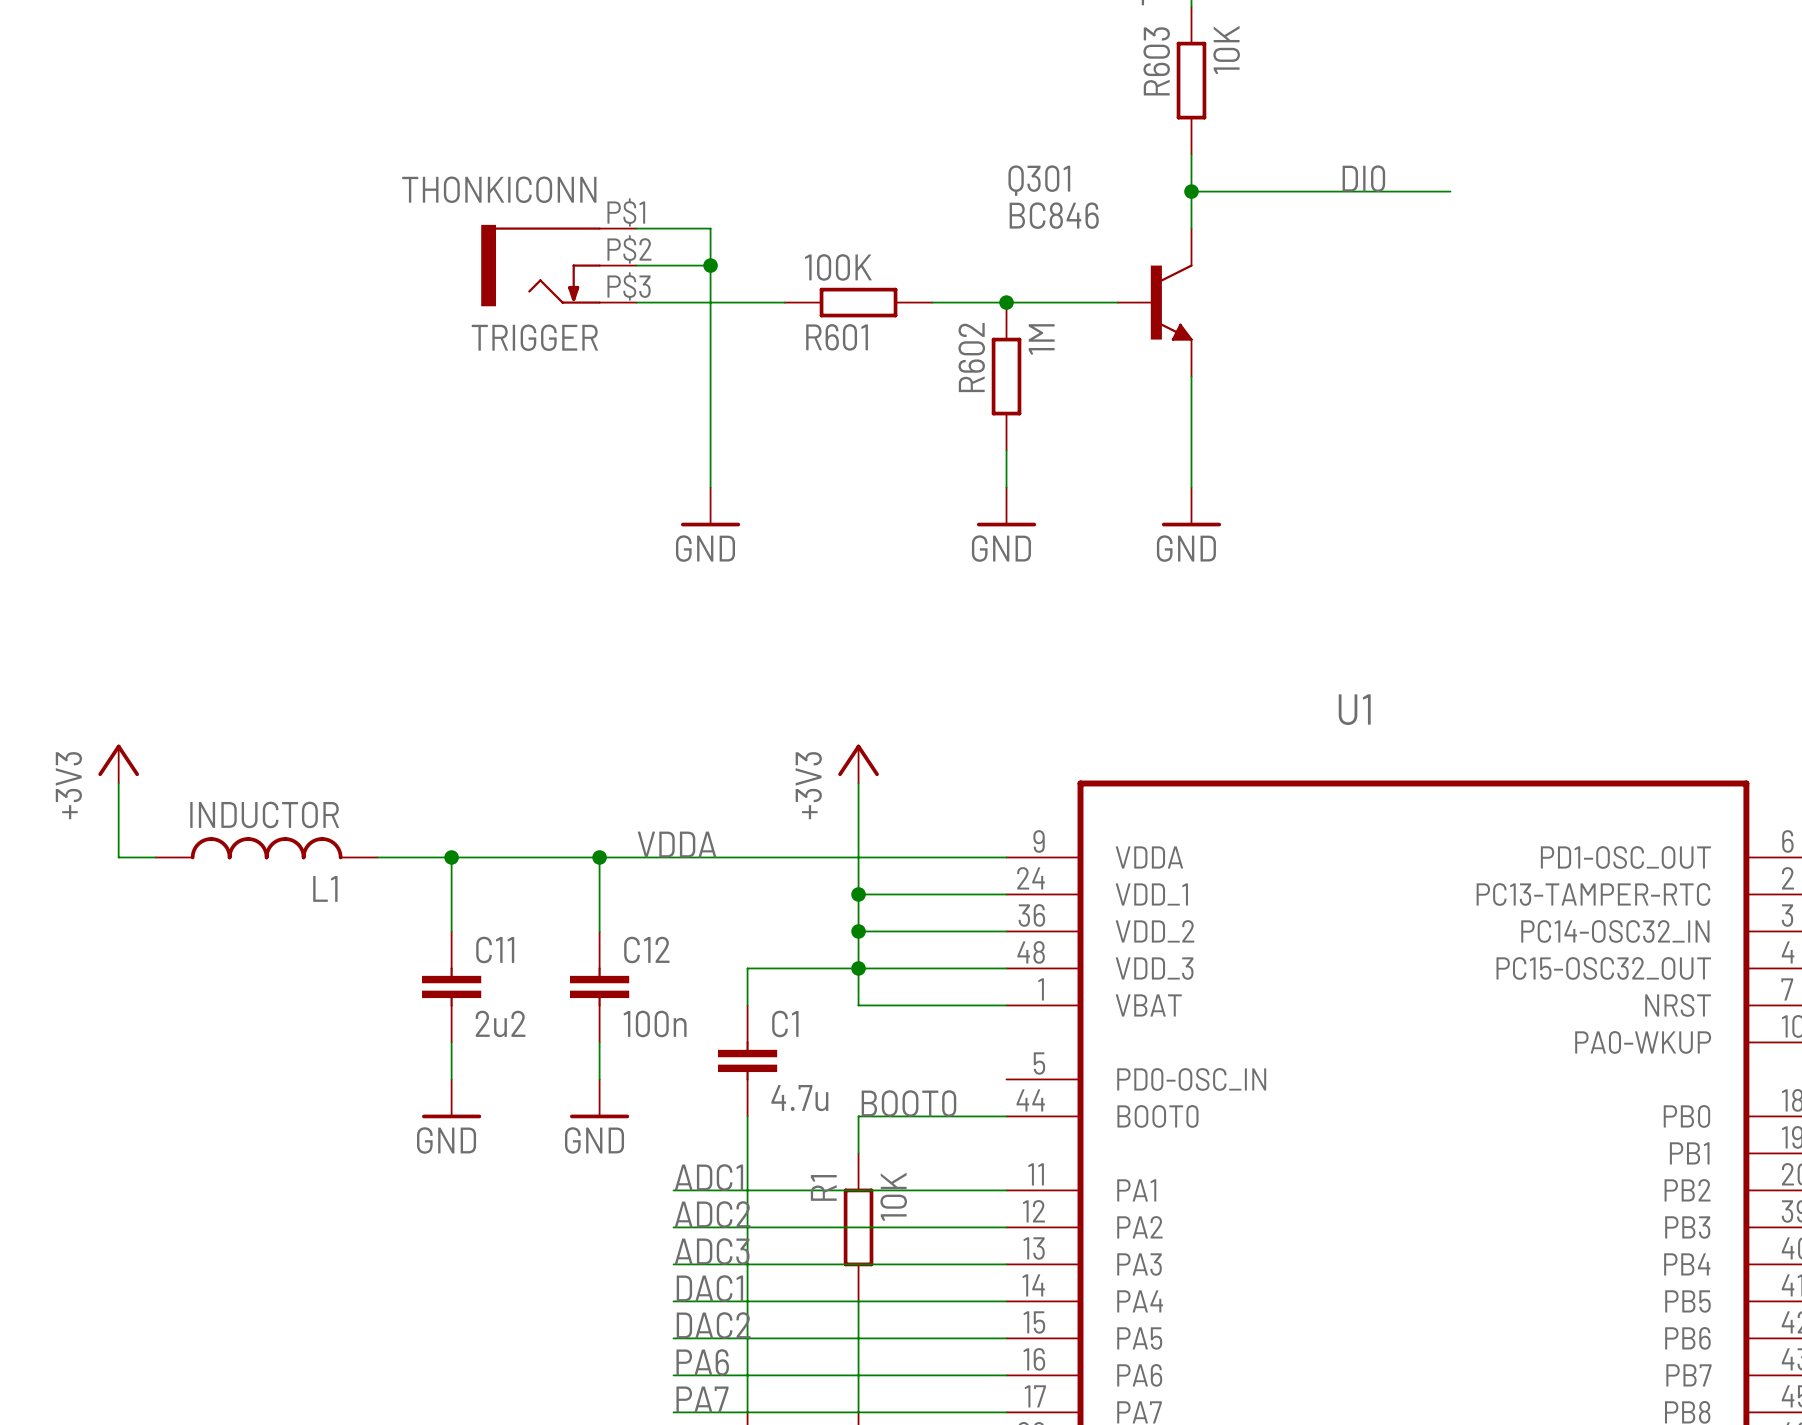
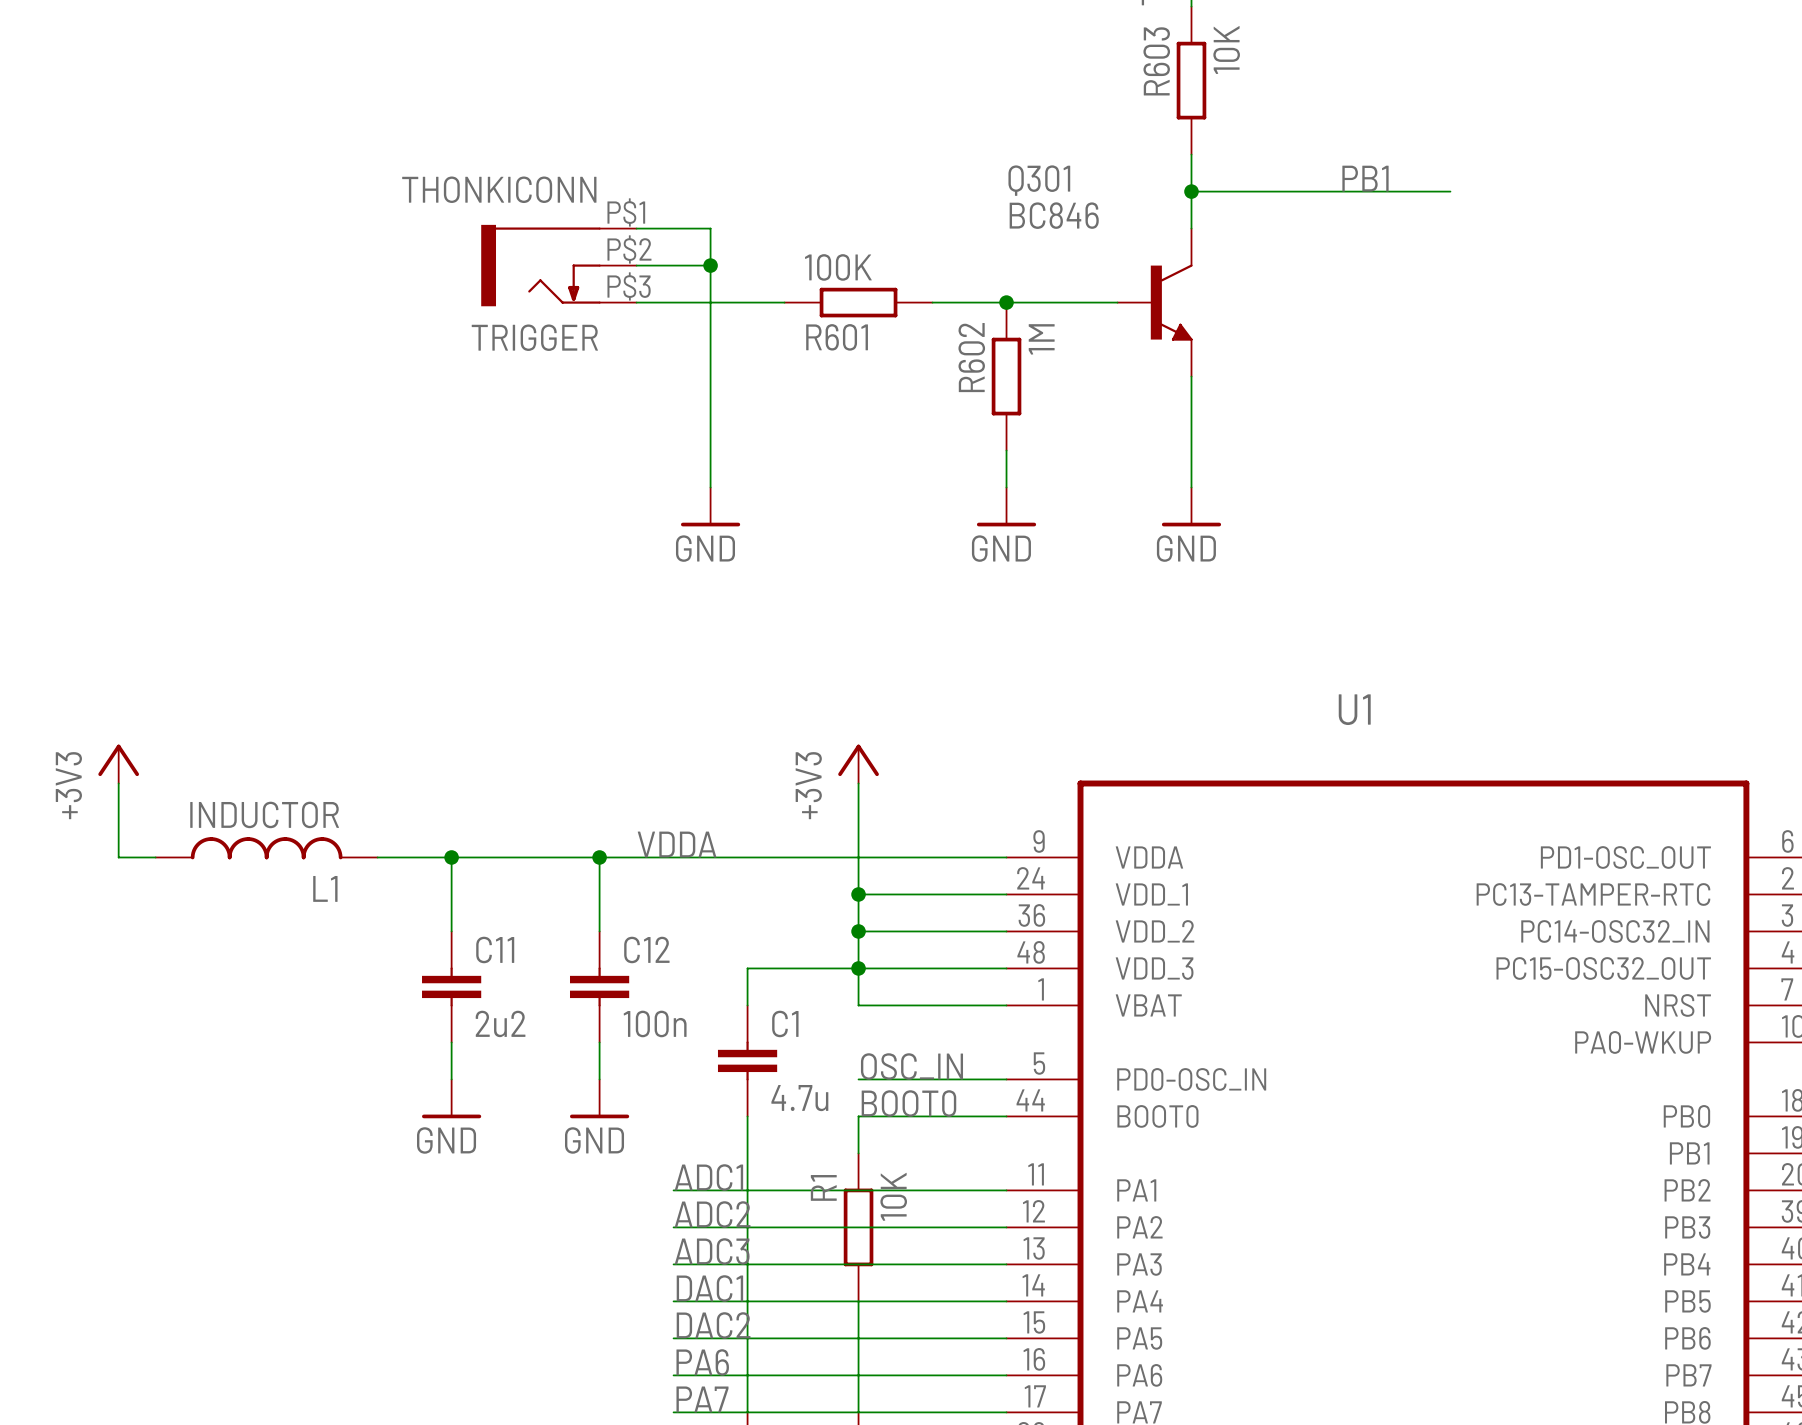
label: DI0 (1363, 178) -> PB1 (1365, 178)
label: none -> OSC_IN (911, 1066)
wire: none -> (858, 1079) (1006, 1079)

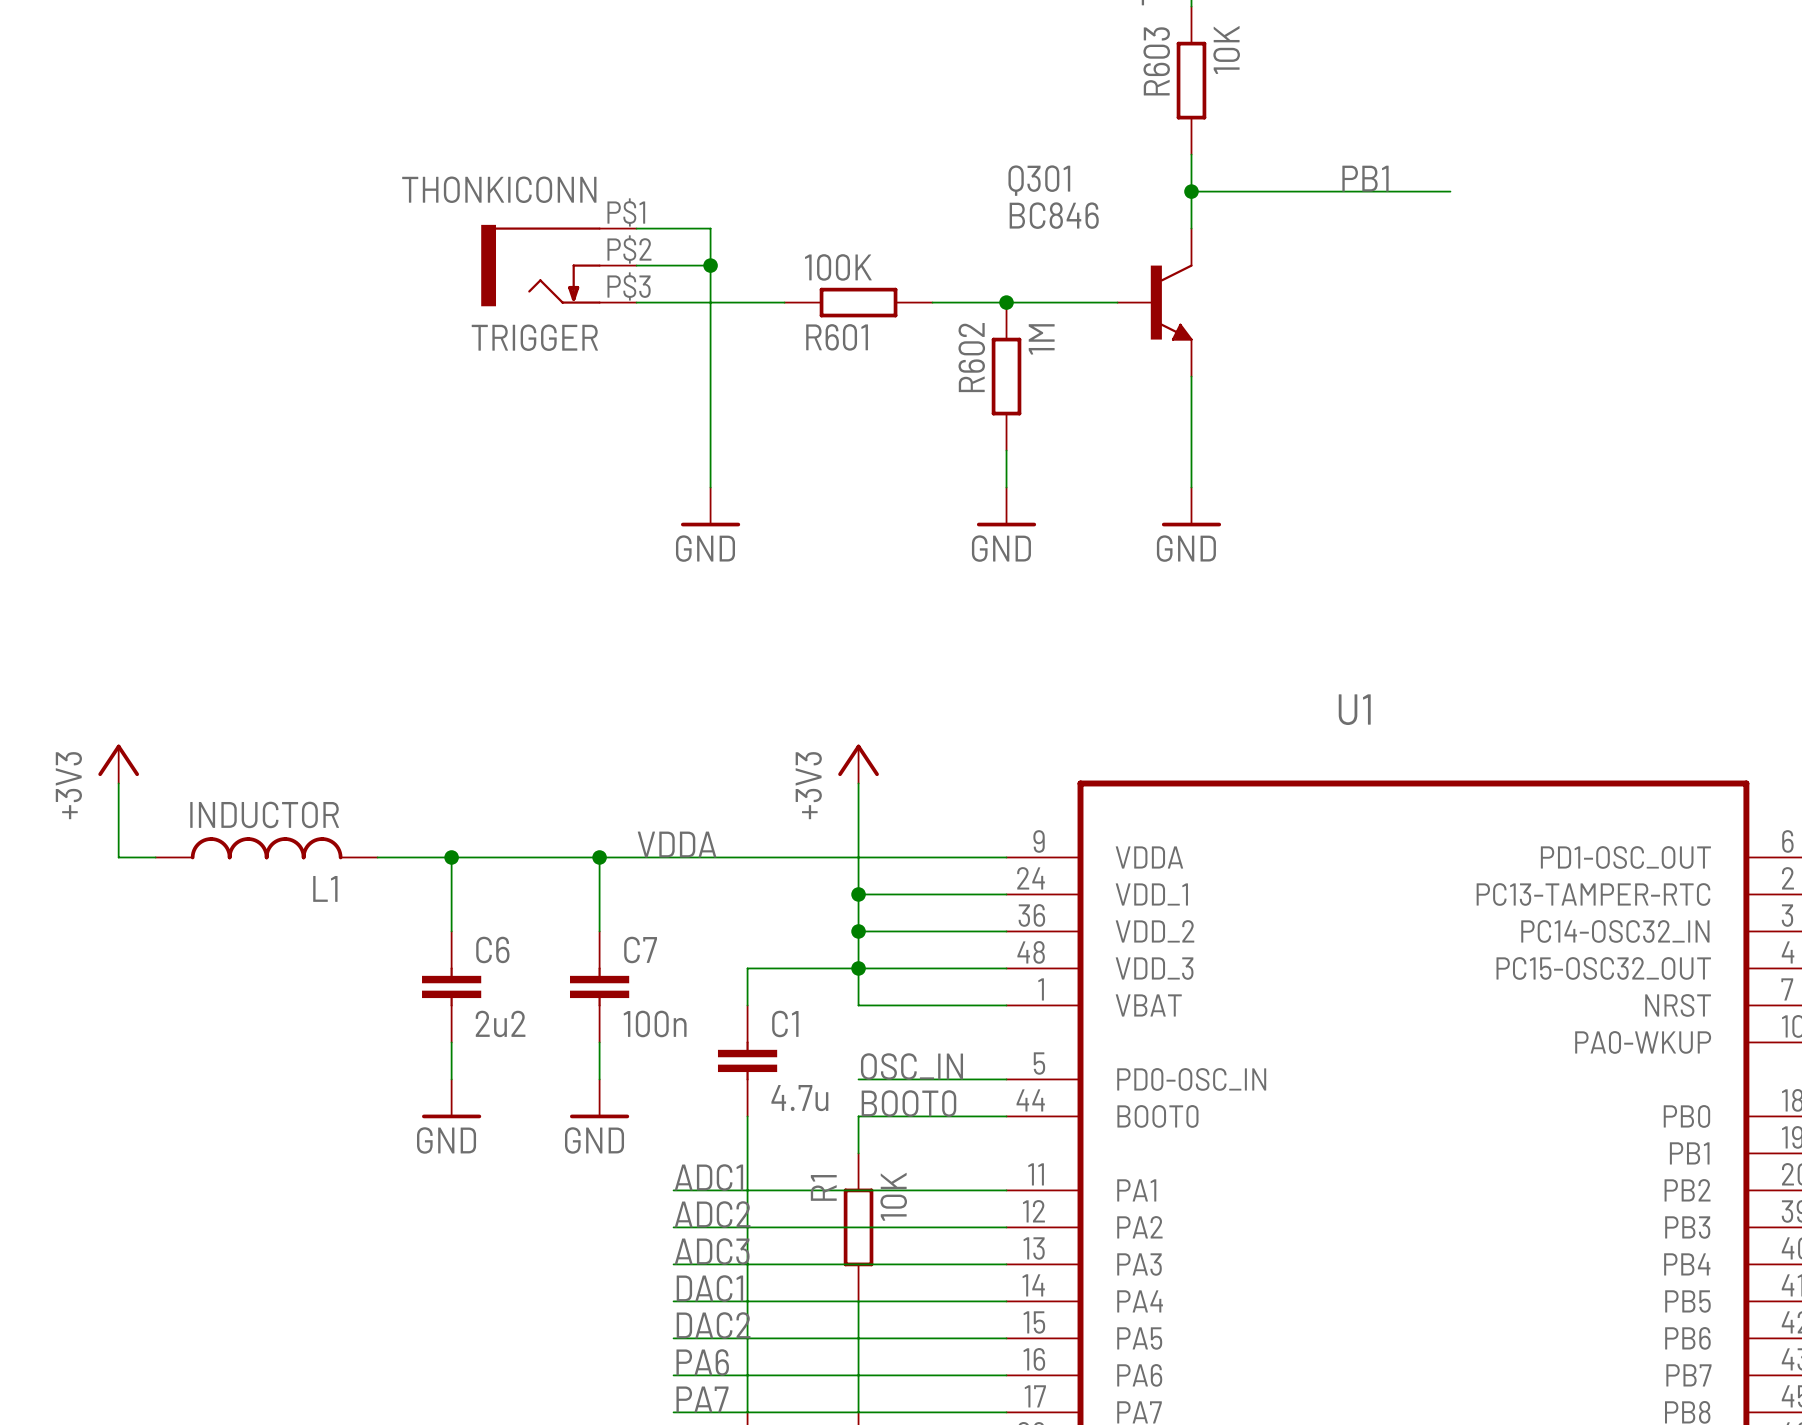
C11 name: C11 (495, 949) -> C6 (492, 949)
C12 name: C12 (646, 949) -> C7 (640, 949)

